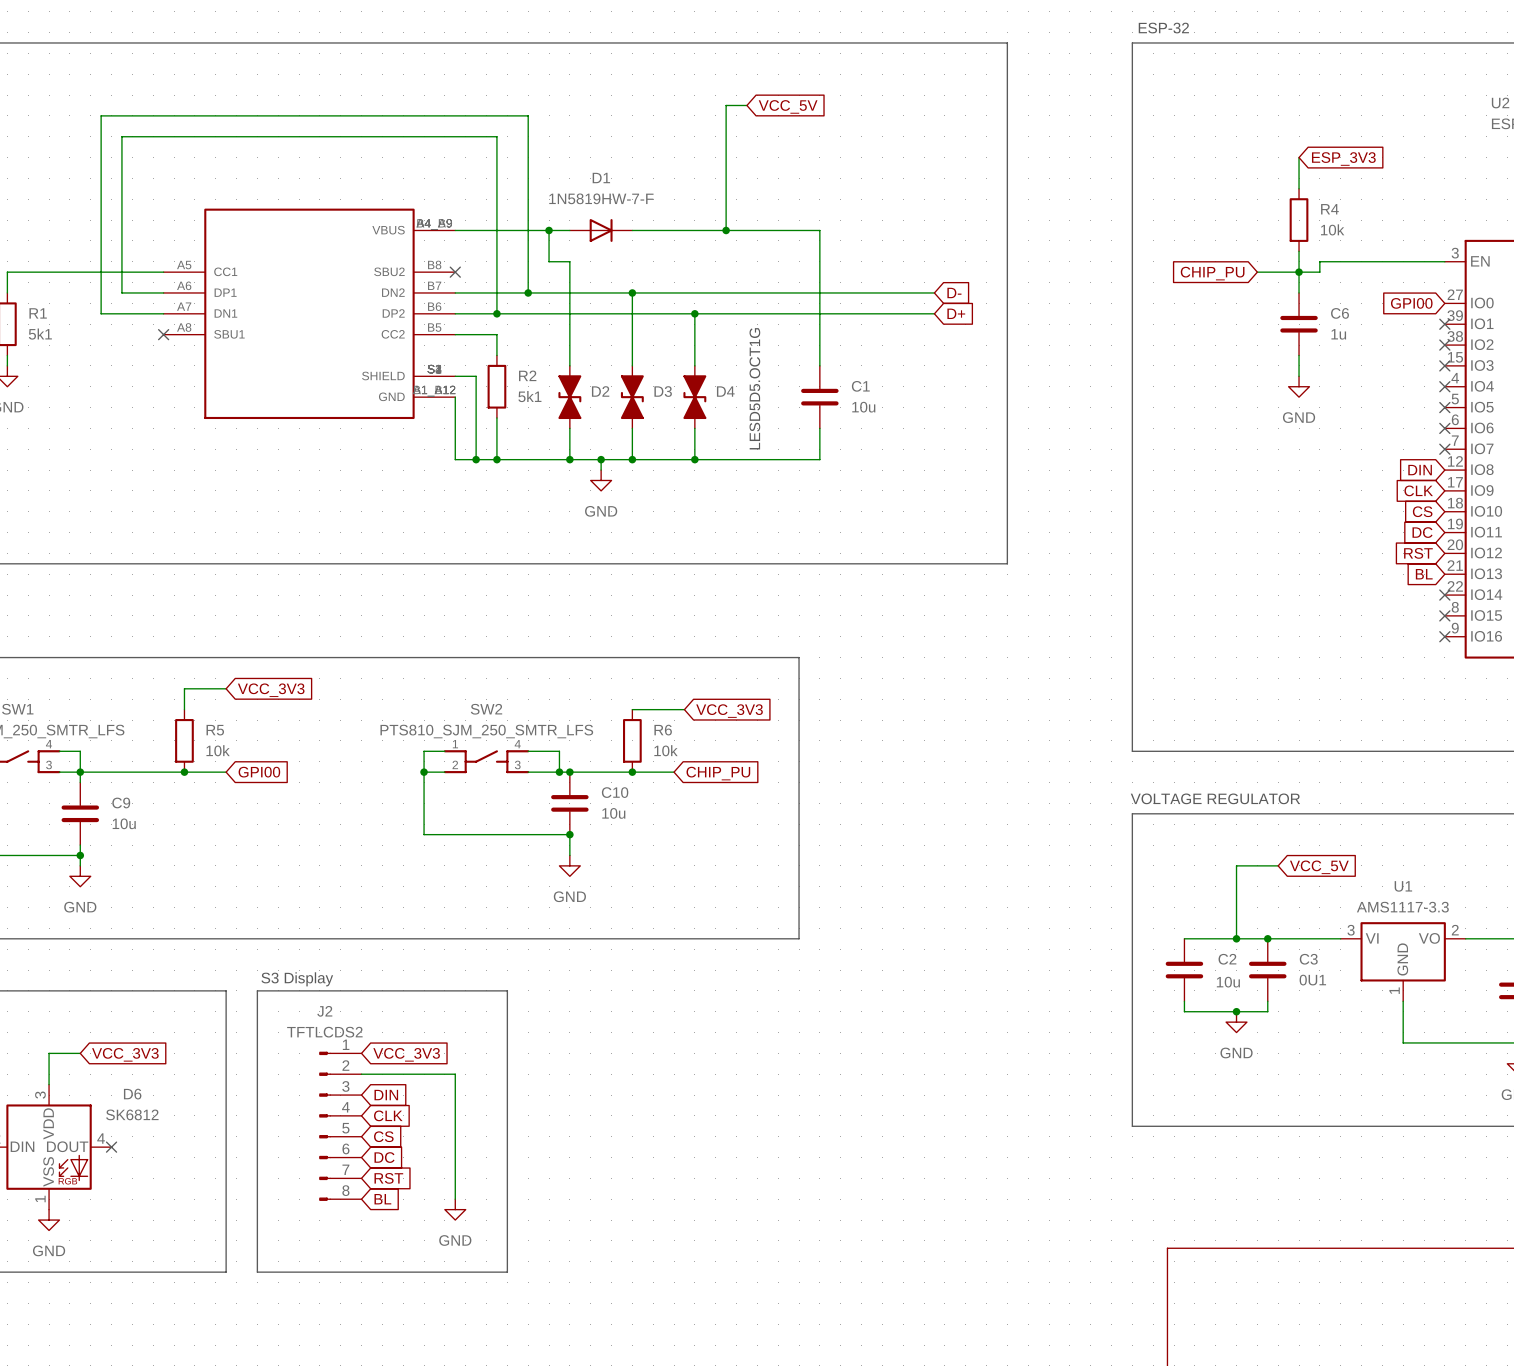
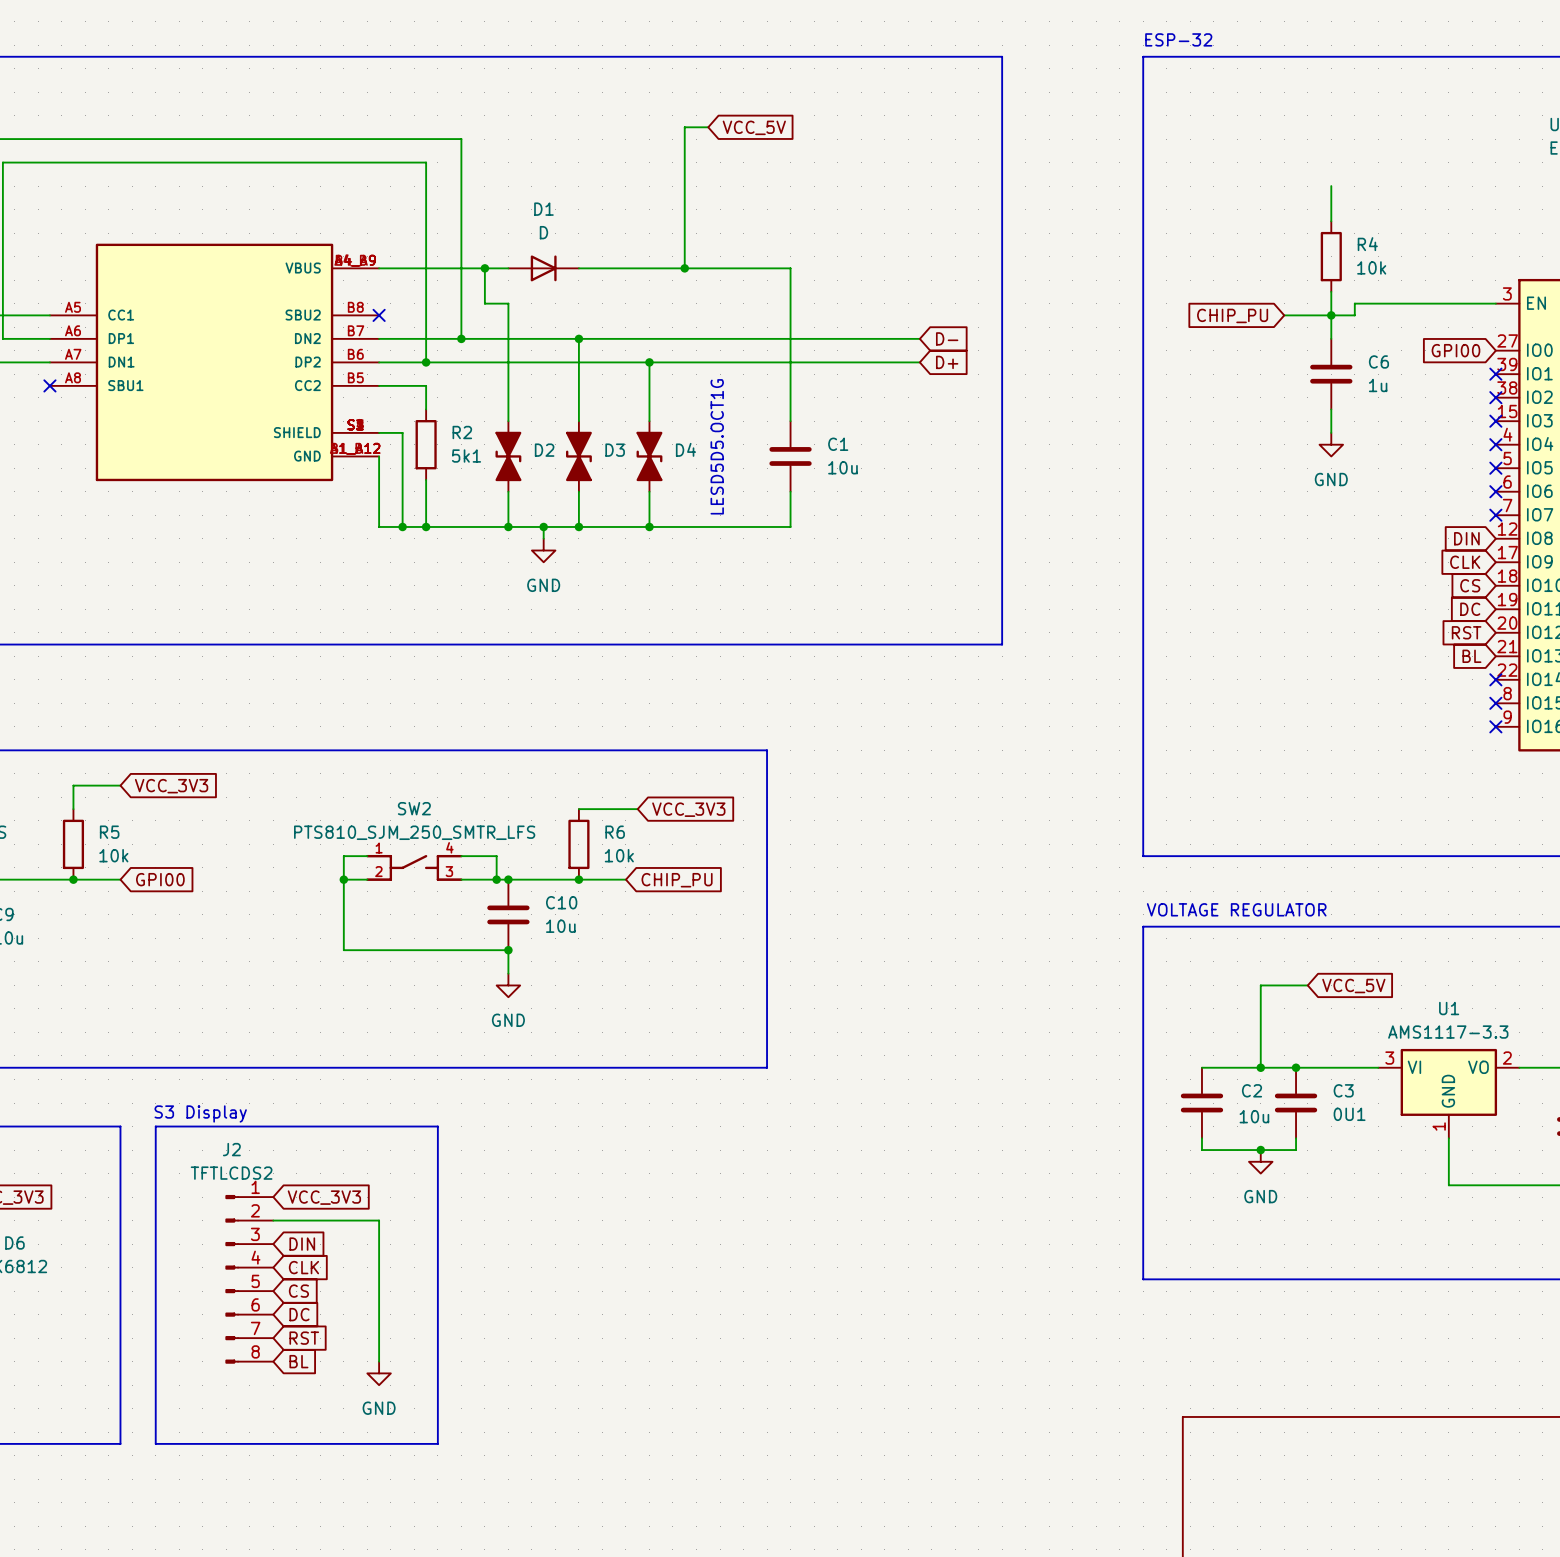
global label: ESP_3V3 (1343, 158) -> none
D1 value: 1N5819HW-7-F (601, 198) -> D (543, 232)

